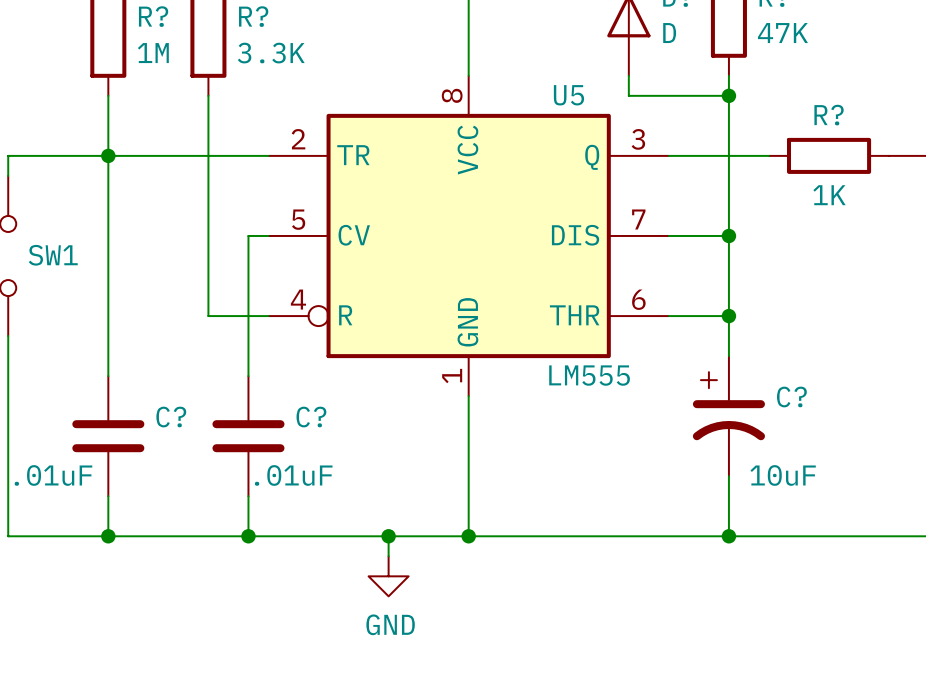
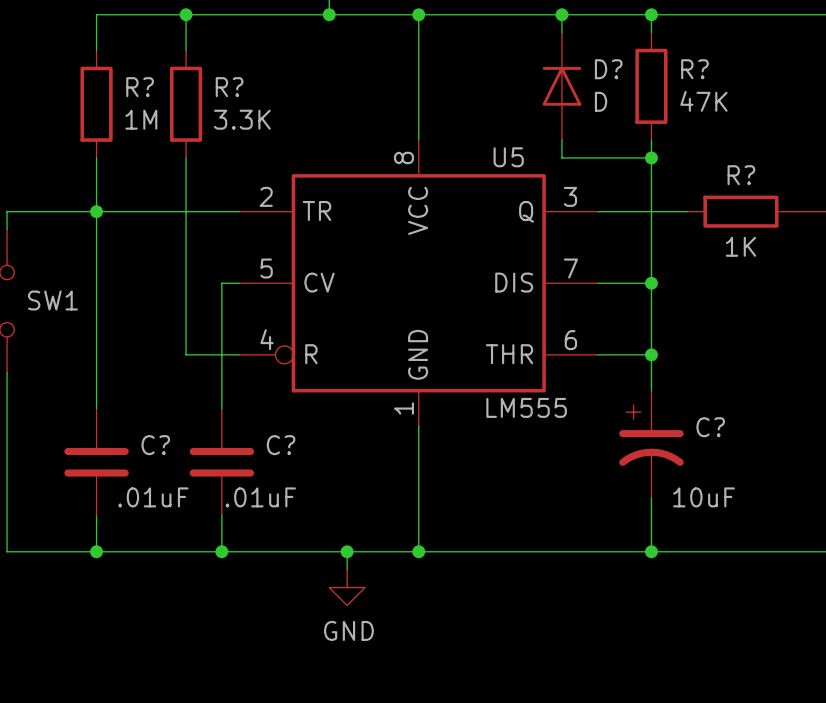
C? value position: .01uF (53, 475) -> .01uF (153, 497)

